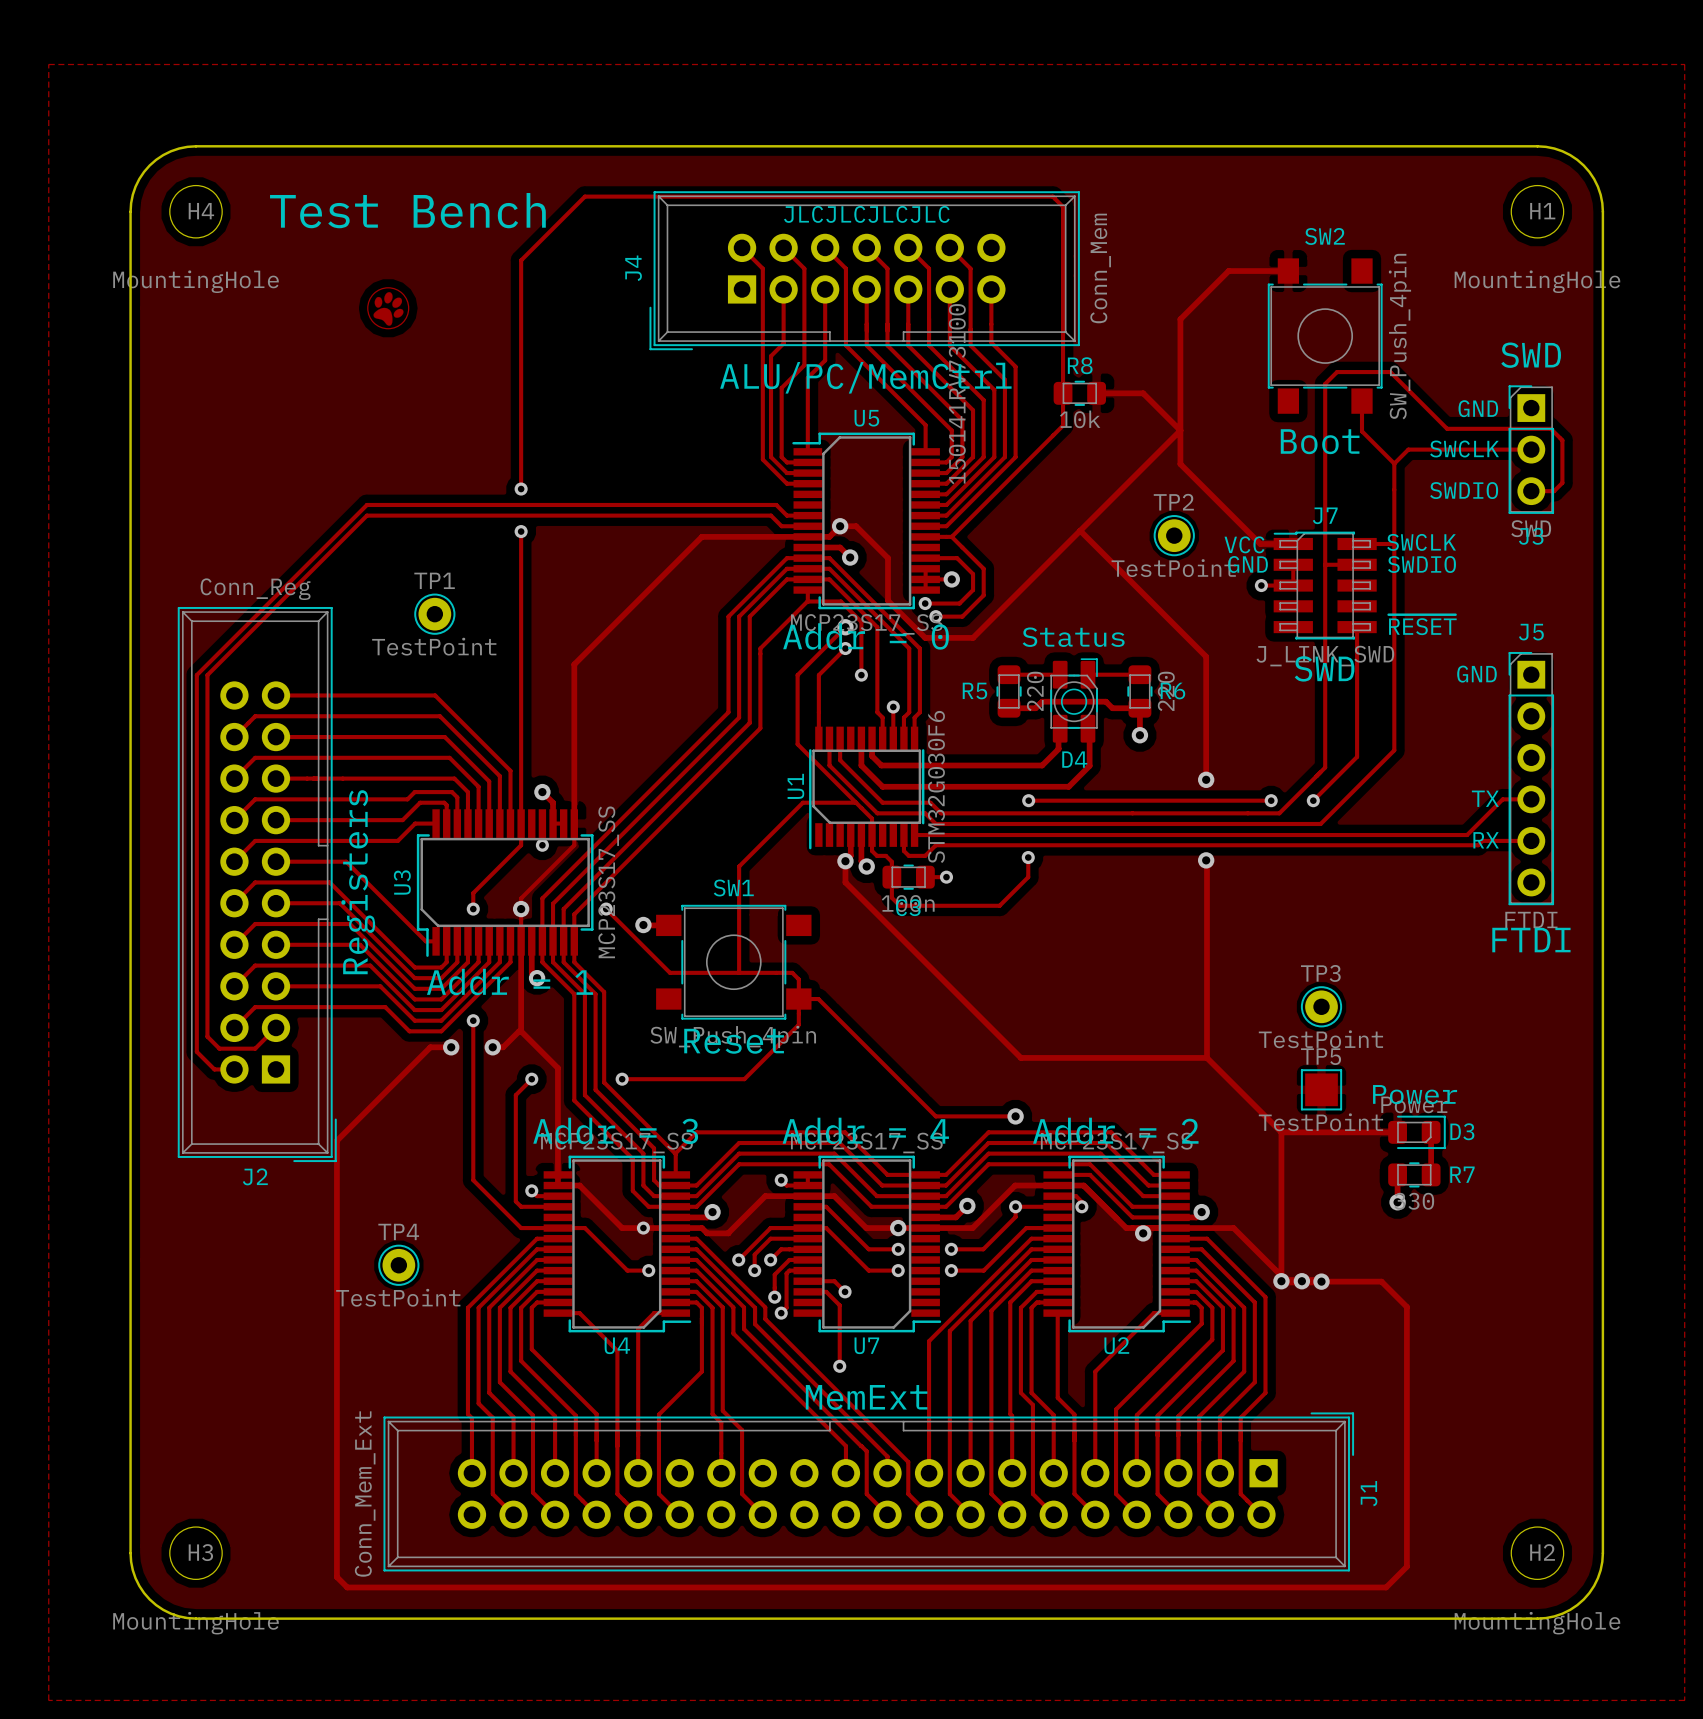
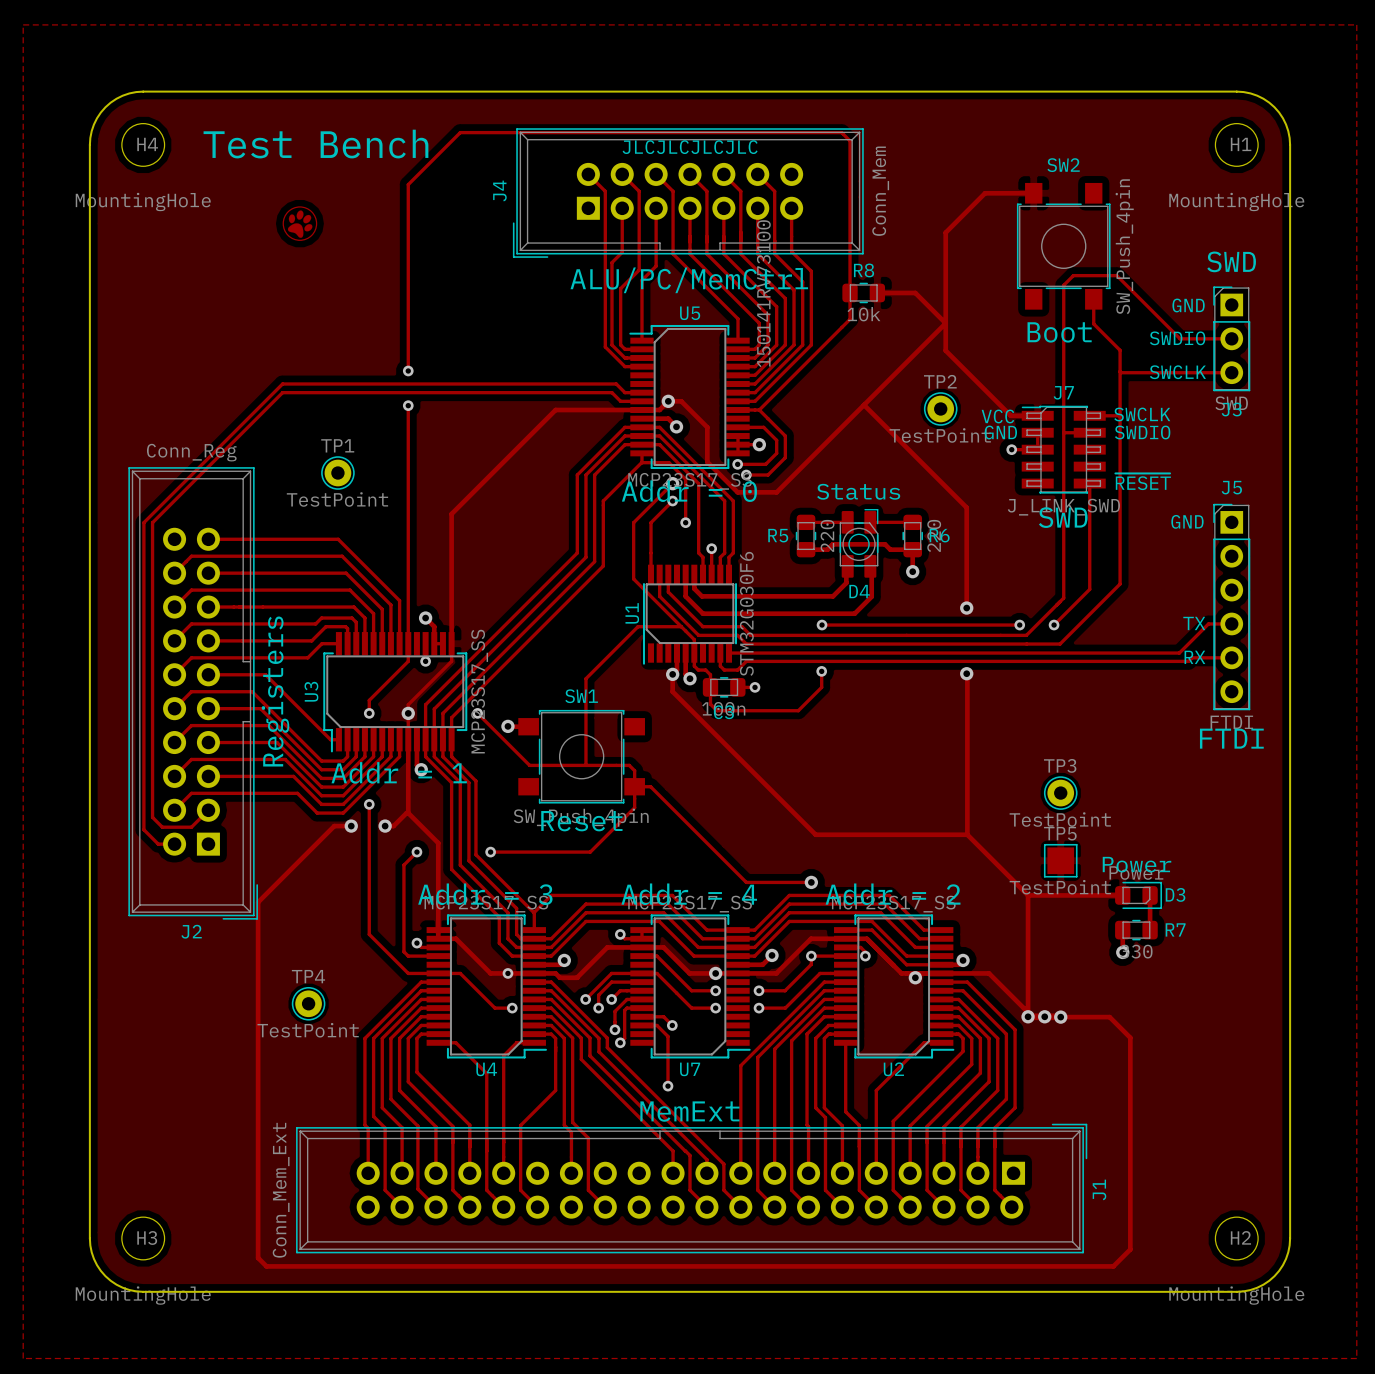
track: (1447, 428) (1550, 428) (1562, 440) (1562, 482) (1554, 491) (1531, 491) -> (1120, 371) (1231, 372)
text: SWCLK (1464, 448) -> SWDIO (1177, 338)
track: (1467, 449) (1408, 449) (1394, 463) -> (1180, 338) (1163, 321)
text: SWDIO (1464, 490) -> SWCLK (1177, 372)

